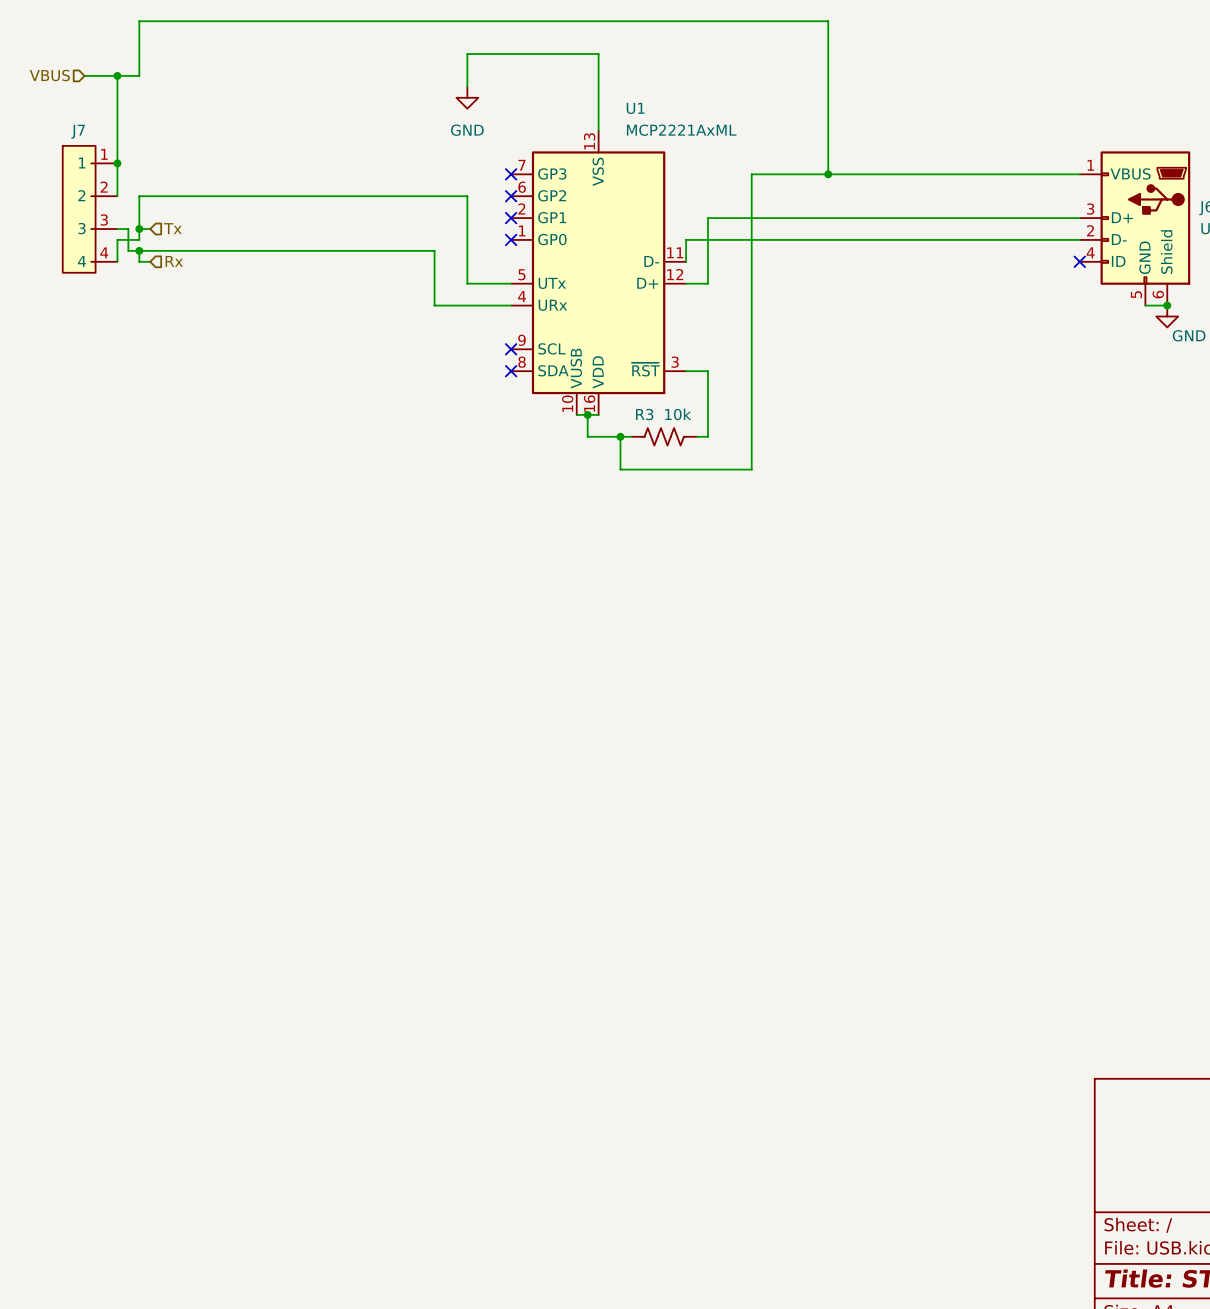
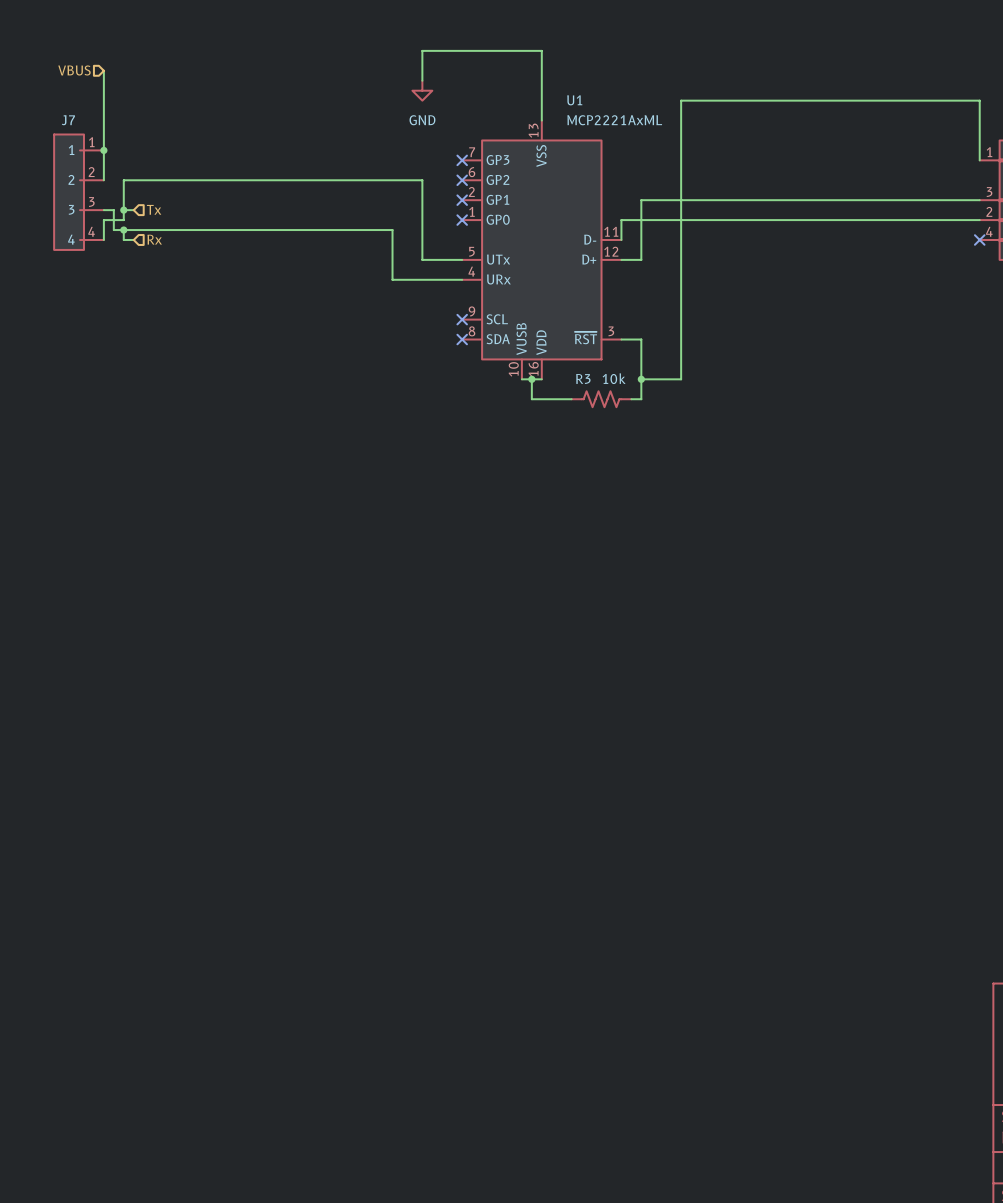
hierarchical label position: VBUS (49, 75) -> VBUS (74, 70)
wire: (84, 75) (139, 75) (139, 21) (828, 21) (828, 174) -> none
junction: (117, 75) -> none
wire: (751, 174) (1079, 174) -> (681, 160) (681, 100) (979, 100) (979, 160)
junction: (828, 174) -> none
junction: none -> (641, 379)
wire: (751, 414) (751, 469) (620, 469) (620, 436) -> (681, 379) (641, 379)
junction: (620, 436) -> none

